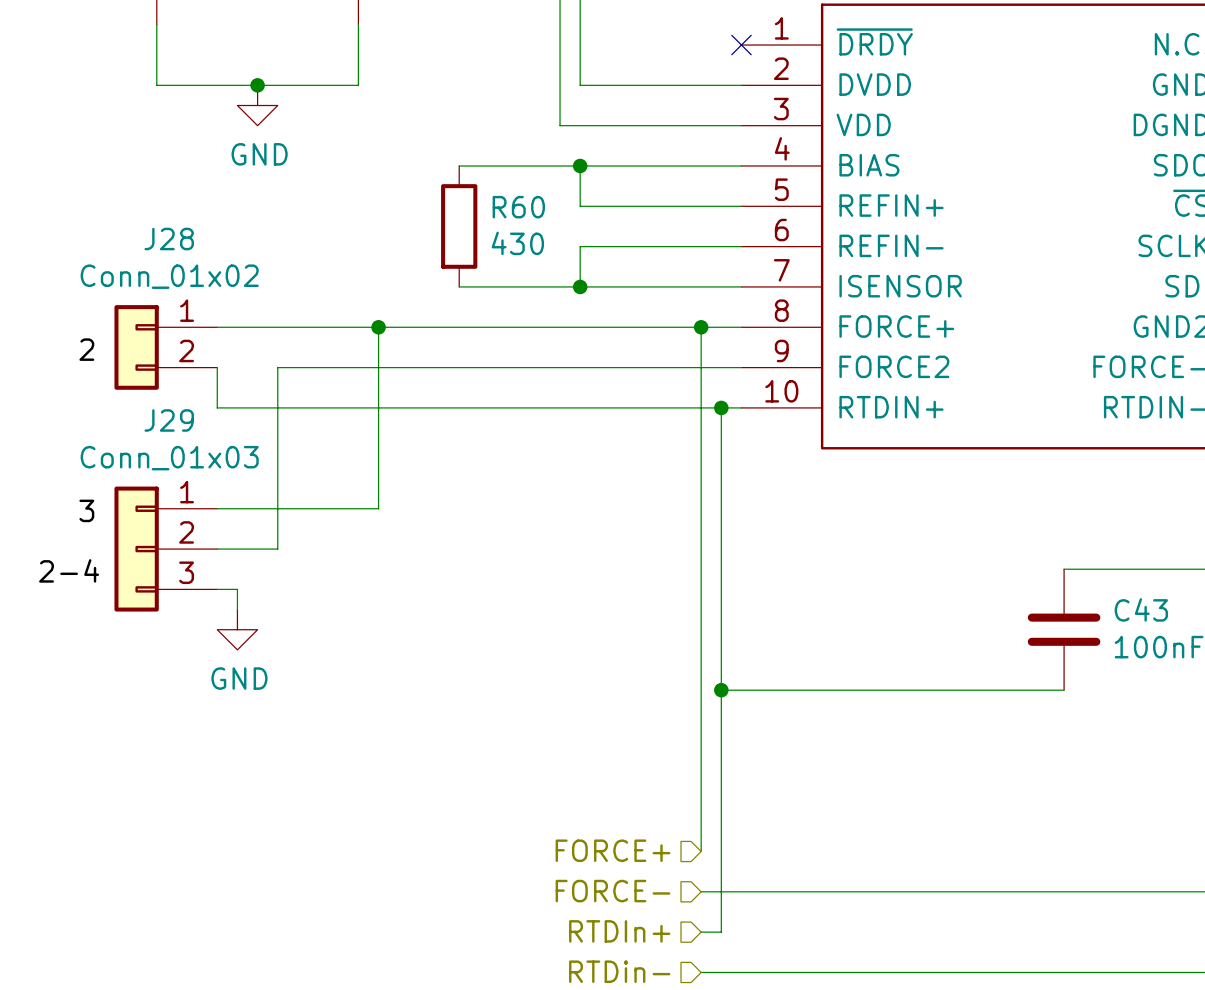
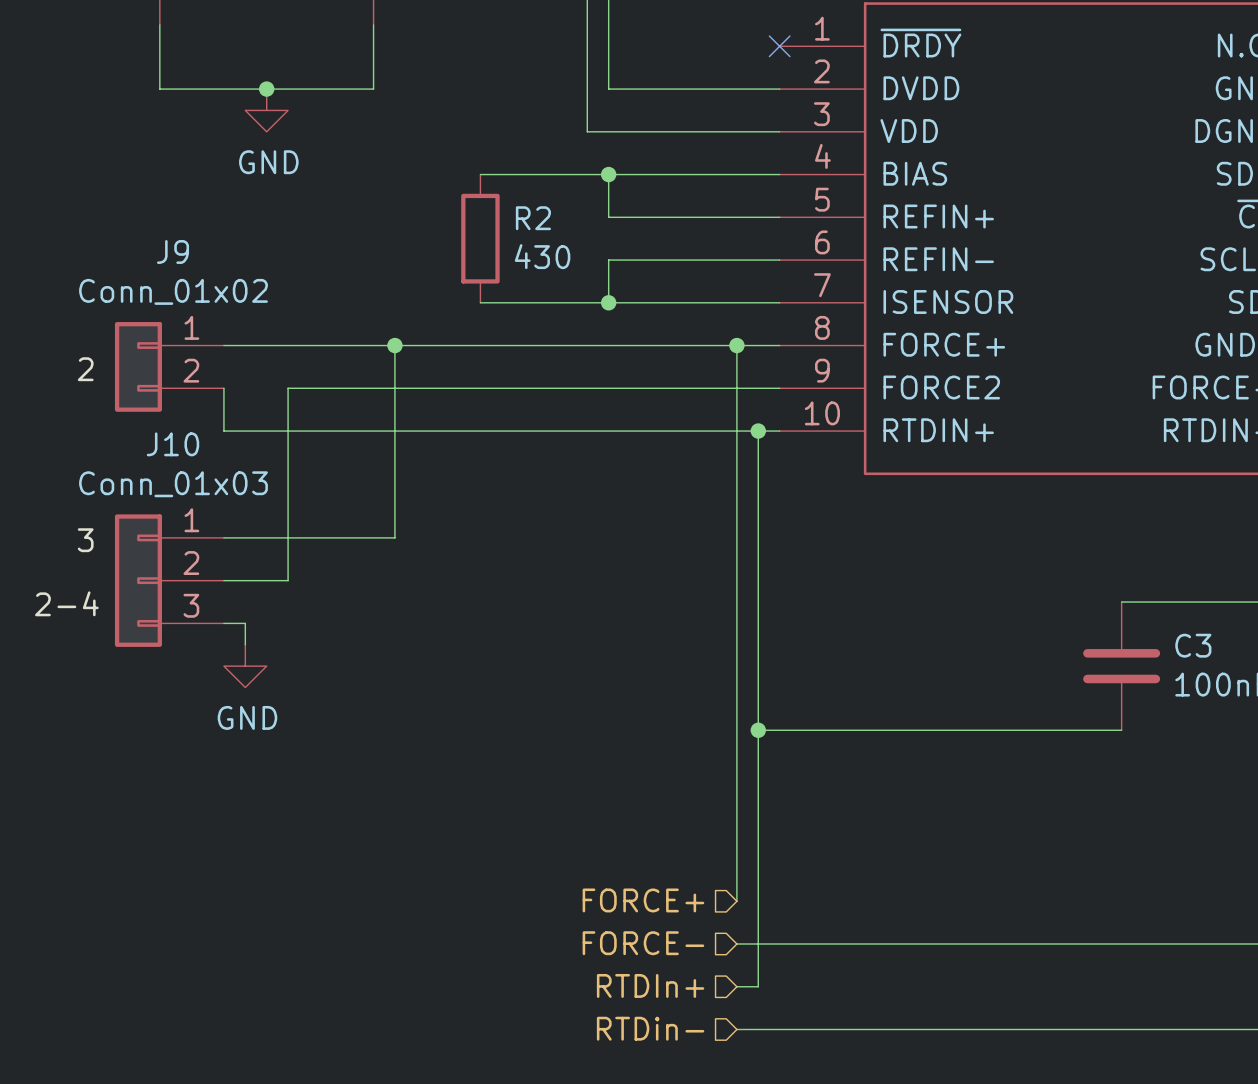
R60 name: R60 (518, 207) -> R2 (533, 218)
J28 name: J28 (169, 239) -> J9 (173, 251)
J29 name: J29 (169, 420) -> J10 (173, 444)
C43 name: C43 (1141, 609) -> C3 (1193, 645)

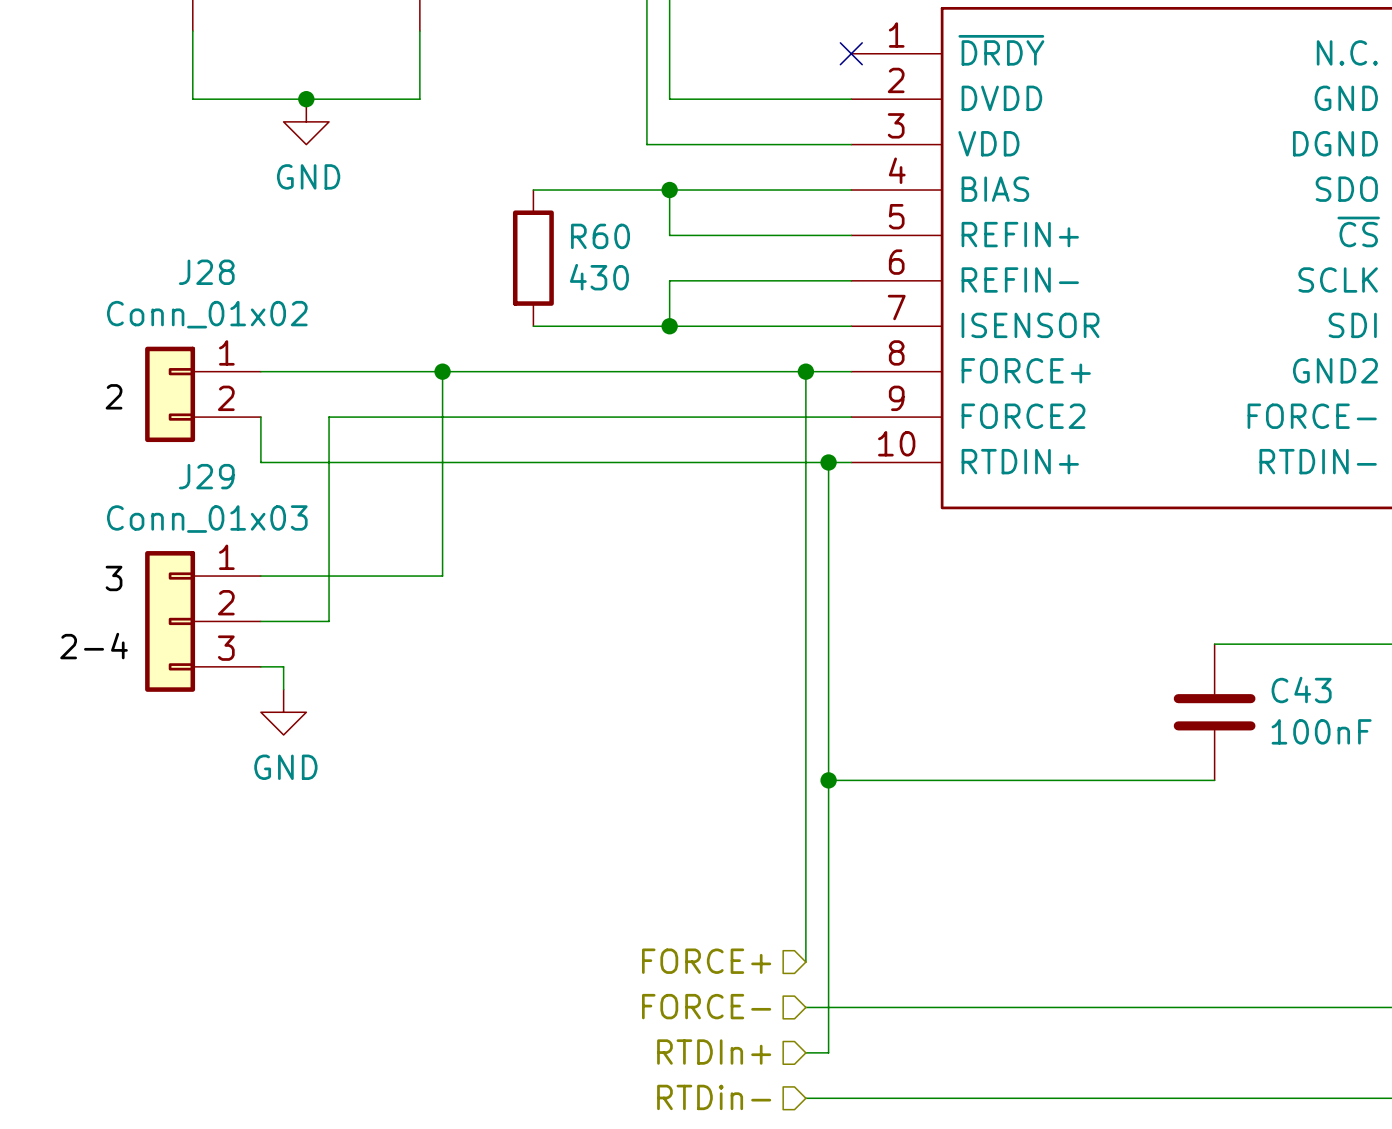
R2 name: R2 (533, 218) -> R60 (600, 236)
J9 name: J9 (173, 251) -> J28 (206, 272)
J10 name: J10 (173, 444) -> J29 (206, 476)
C3 name: C3 (1193, 645) -> C43 (1301, 689)

